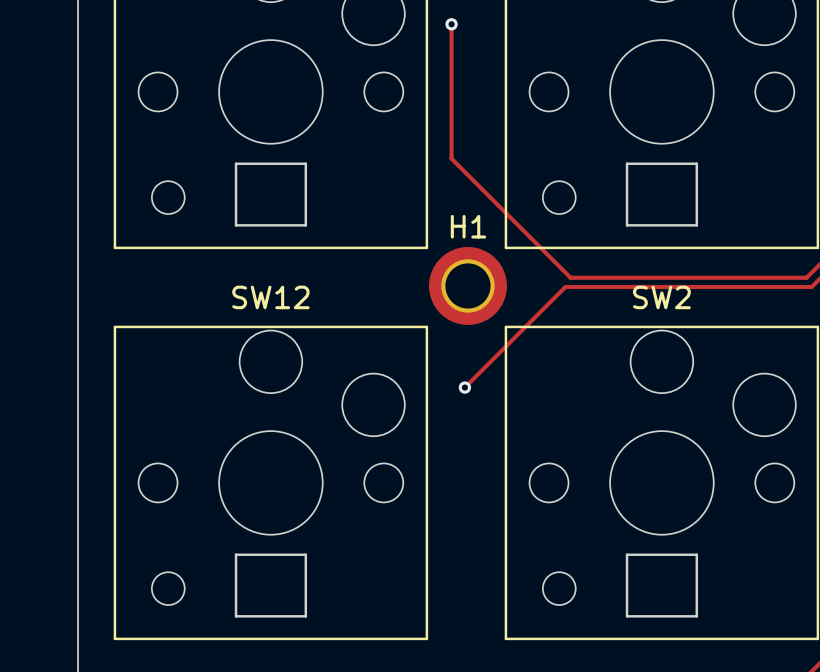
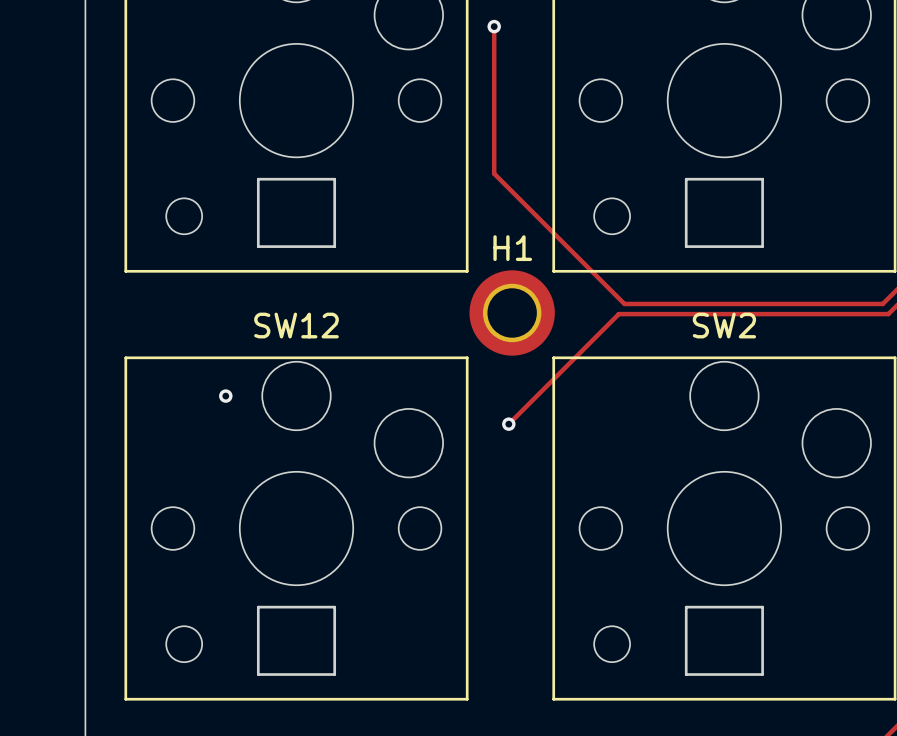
via: none -> (225, 396)

